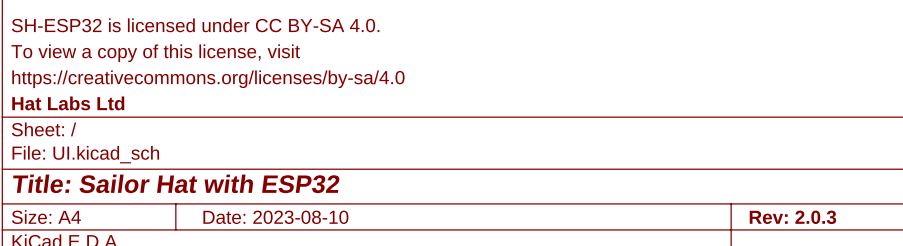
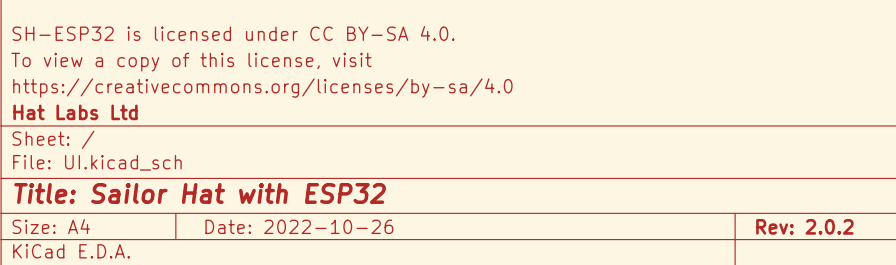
title block: Date: 2023-08-10 (275, 217) -> Date: 2022-10-26 (299, 226)
title block: Rev: 2.0.3 (792, 217) -> Rev: 2.0.2 (804, 226)

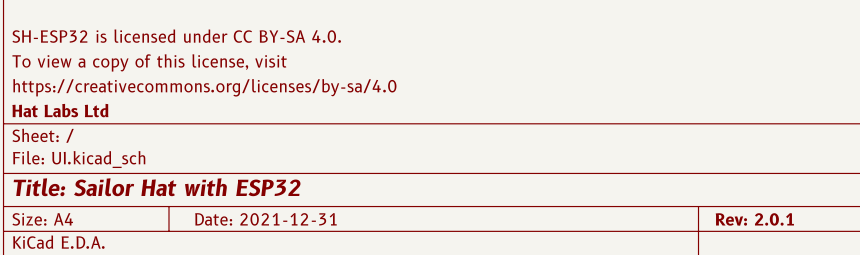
title block: Date: 2022-10-26 (299, 226) -> Date: 2021-12-31 (265, 219)
title block: Rev: 2.0.2 (804, 226) -> Rev: 2.0.1 (754, 219)

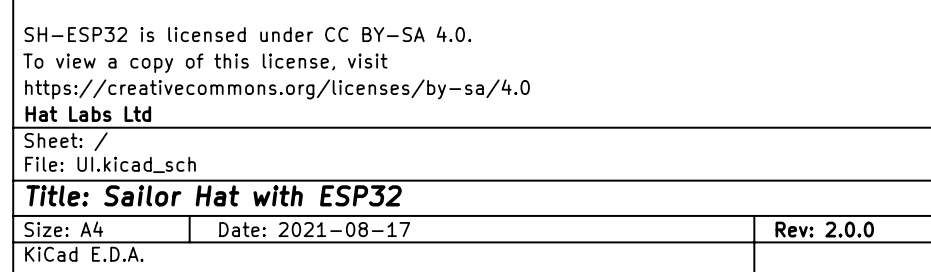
title block: Date: 2021-12-31 (265, 219) -> Date: 2021-08-17 (314, 229)
title block: Rev: 2.0.1 (754, 219) -> Rev: 2.0.0 (824, 229)

